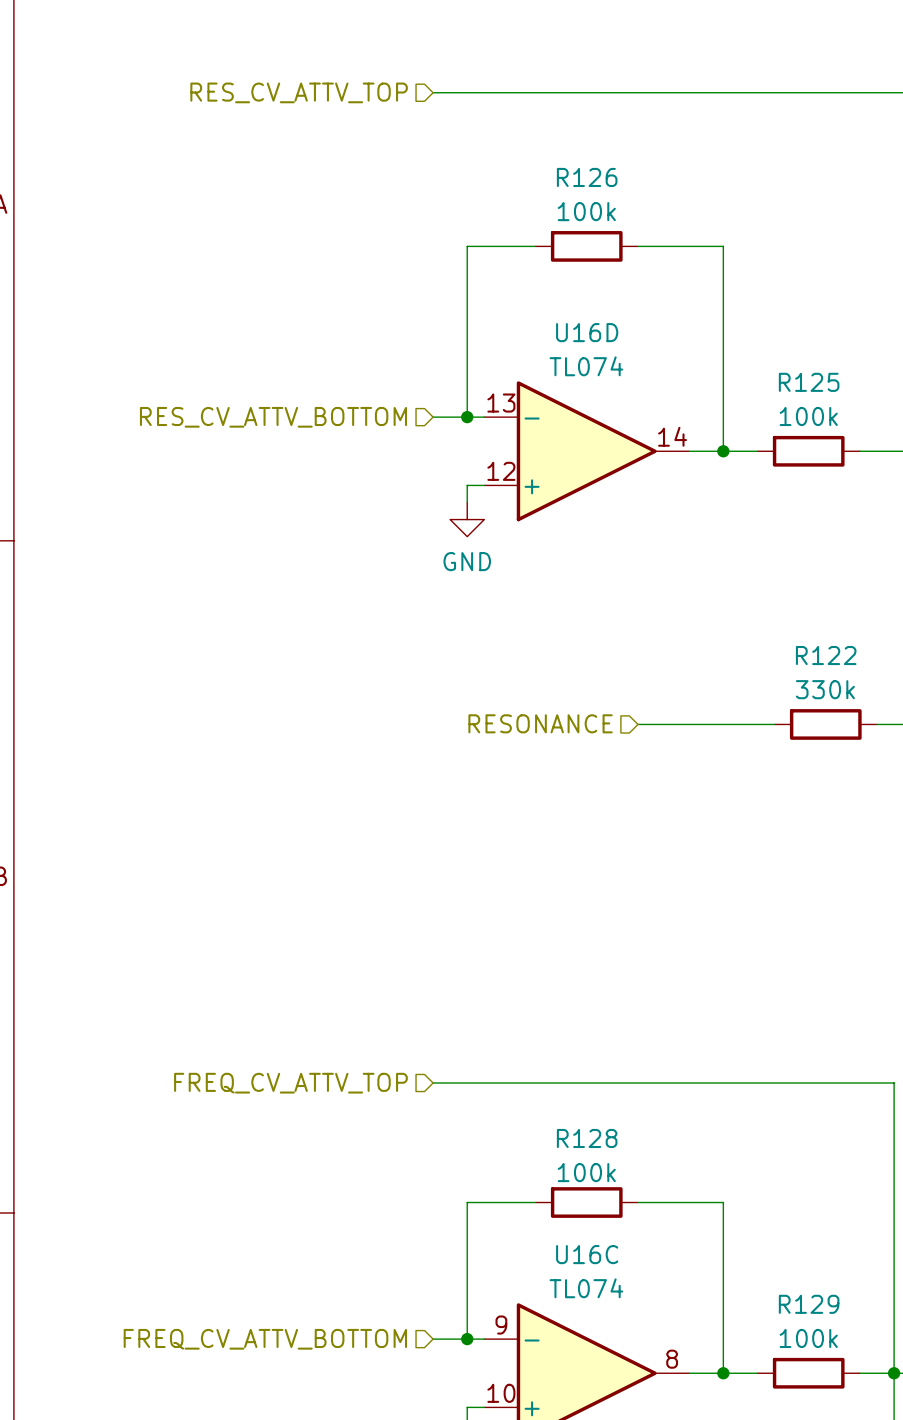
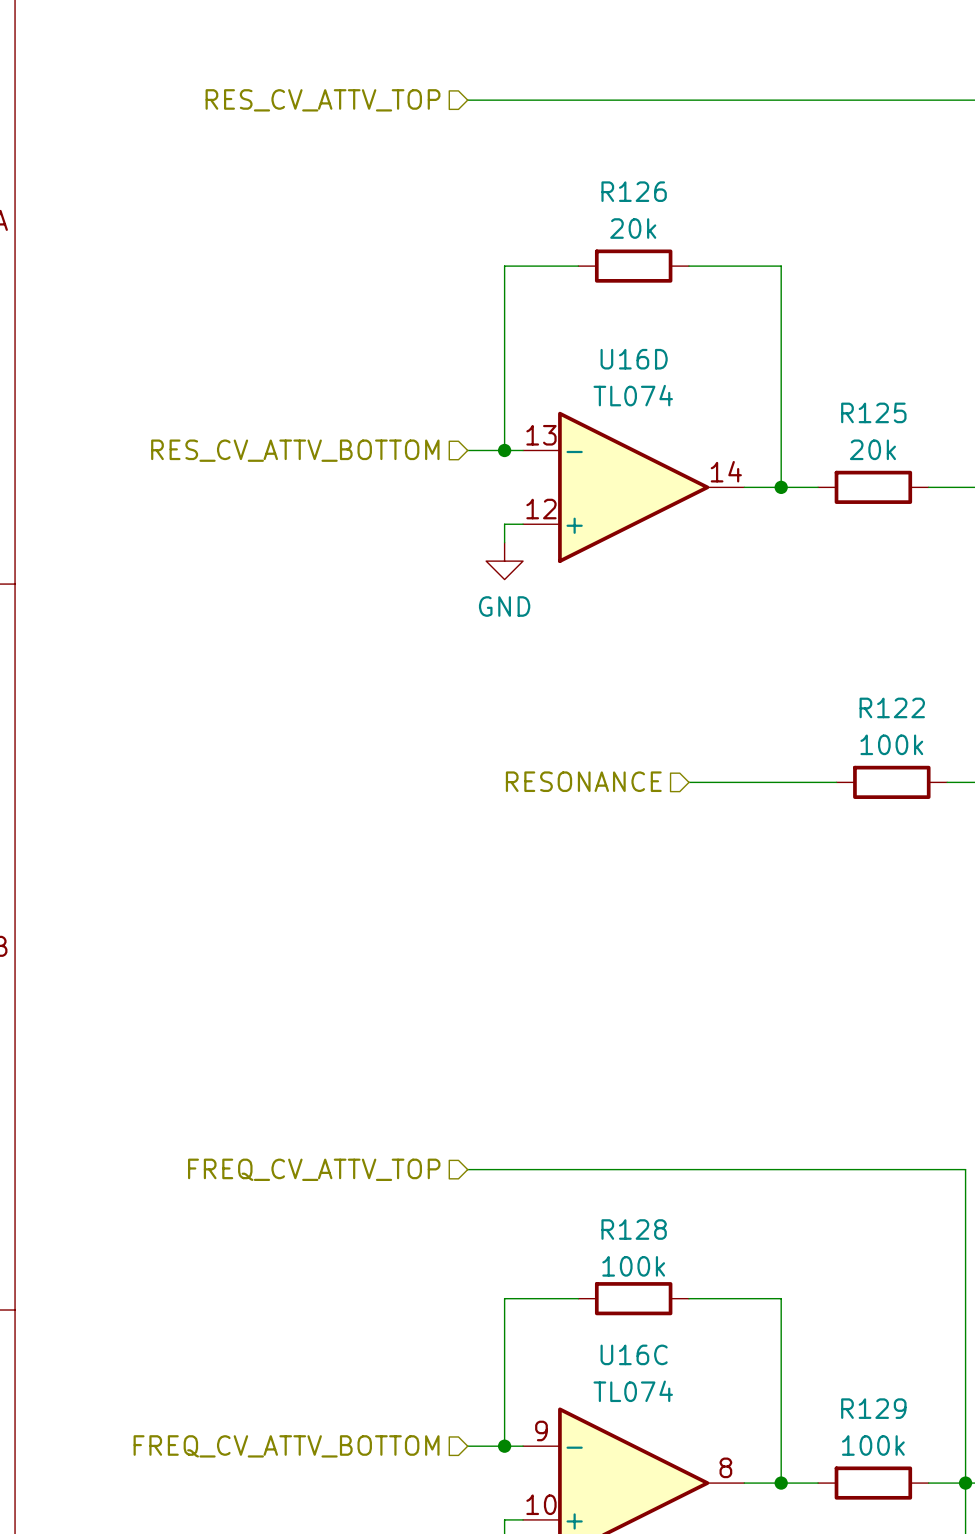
R126 value: 100k (586, 211) -> 20k (633, 228)
R125 value: 100k (808, 416) -> 20k (872, 449)
R122 value: 330k (825, 689) -> 100k (891, 744)

